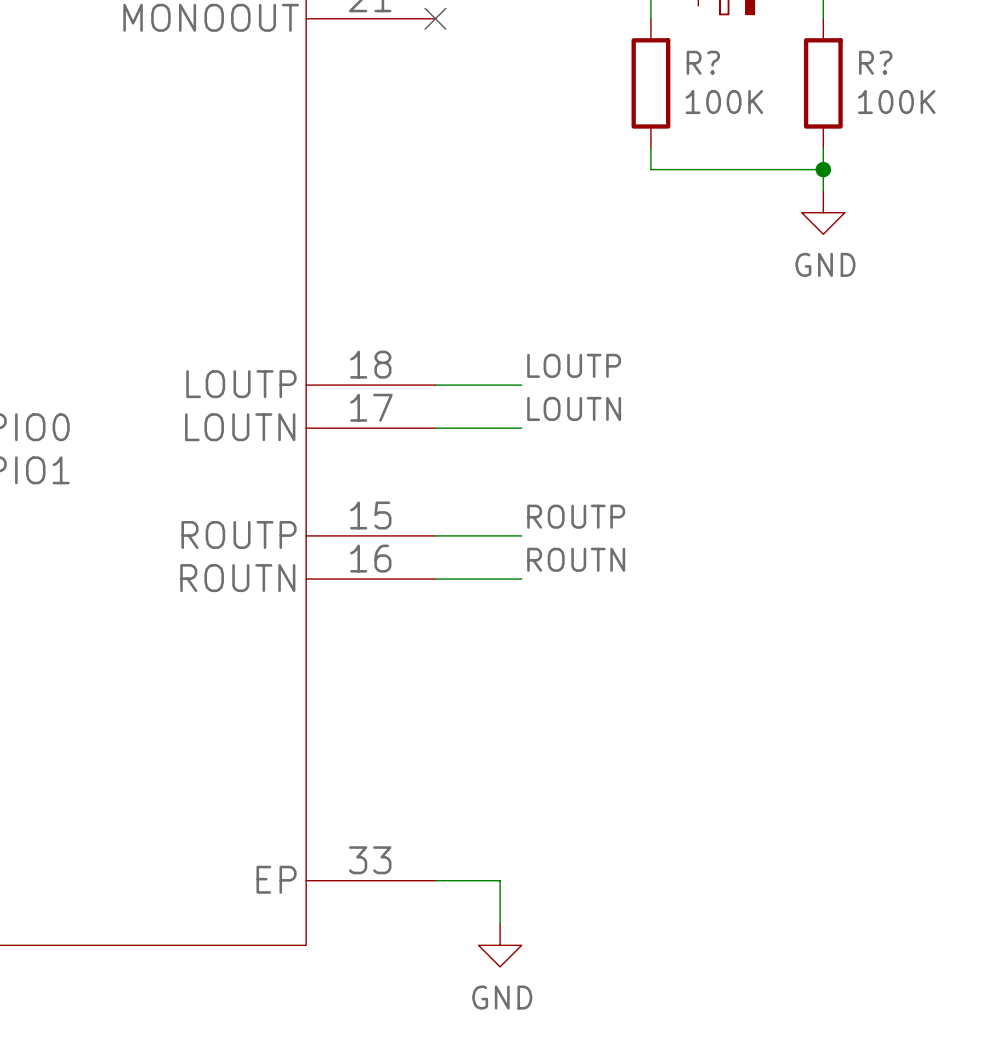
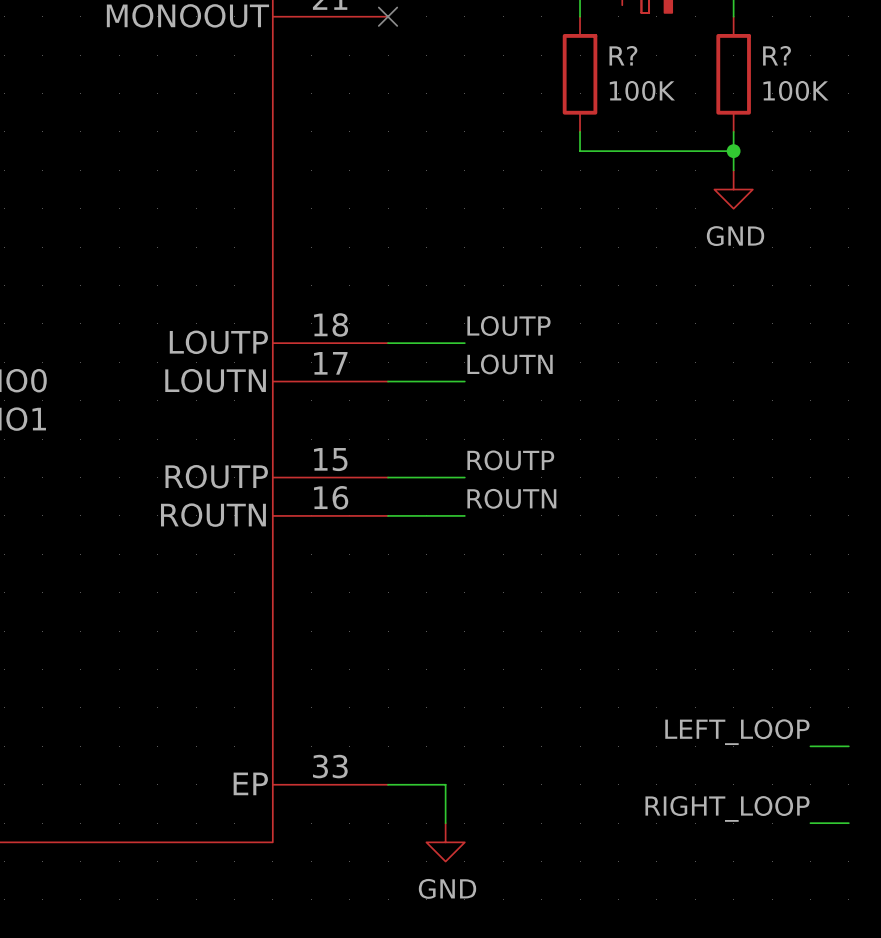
label: none -> LEFT_LOOP (737, 732)
wire: none -> (810, 746) (848, 746)
label: none -> RIGHT_LOOP (727, 808)
wire: none -> (810, 823) (848, 823)

